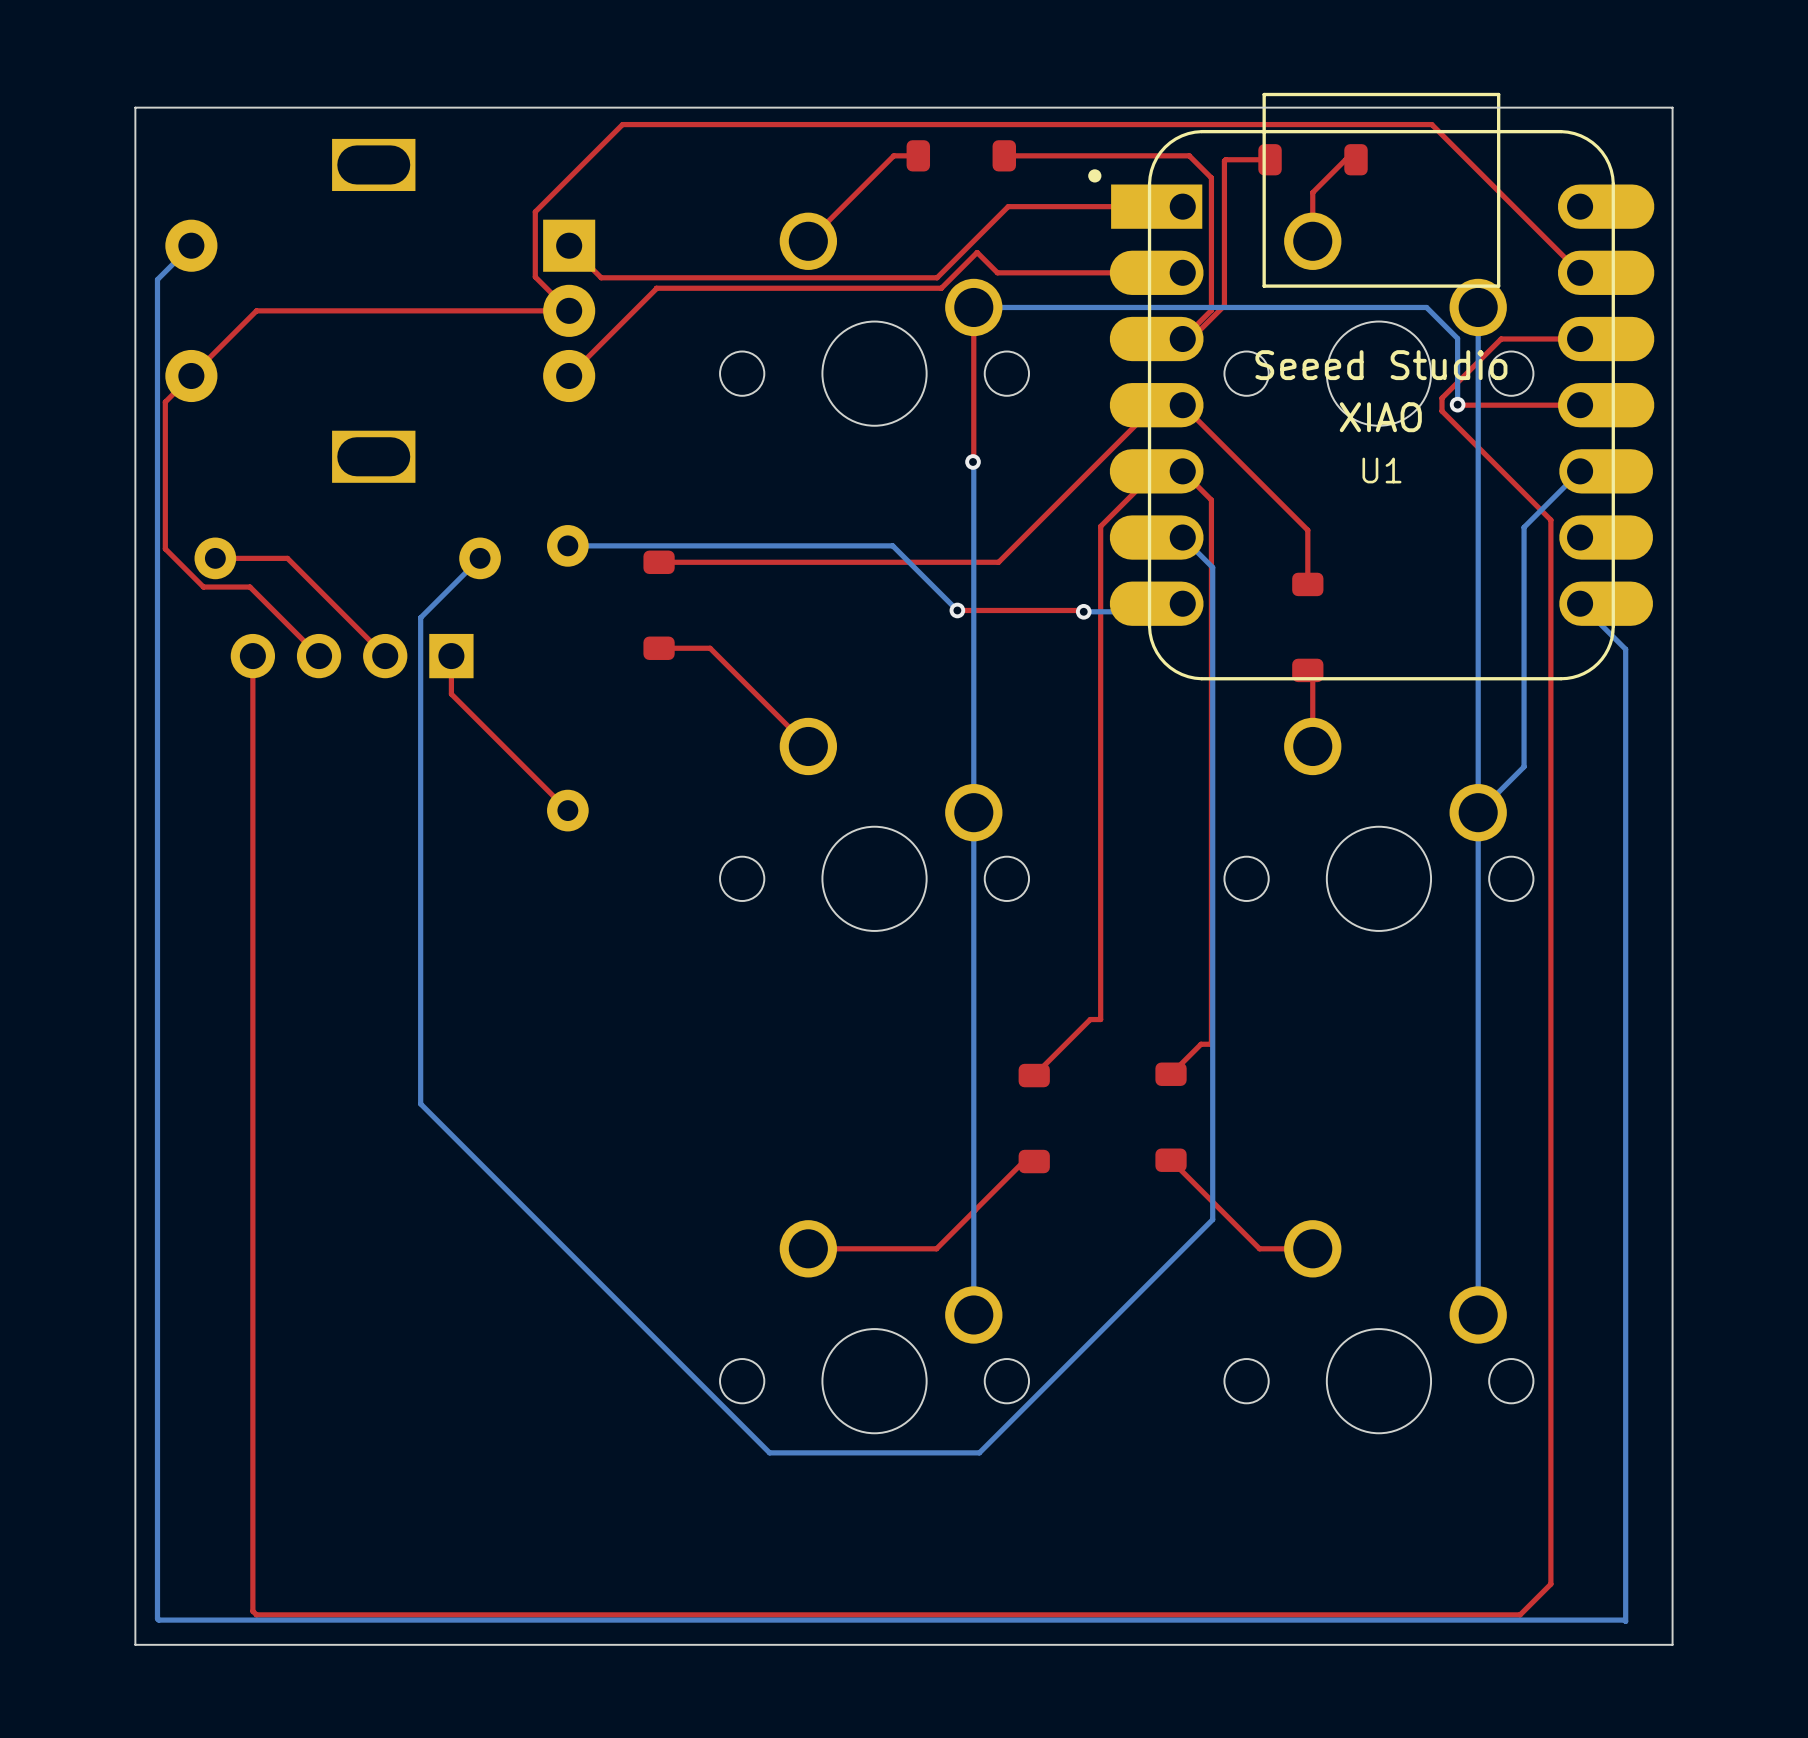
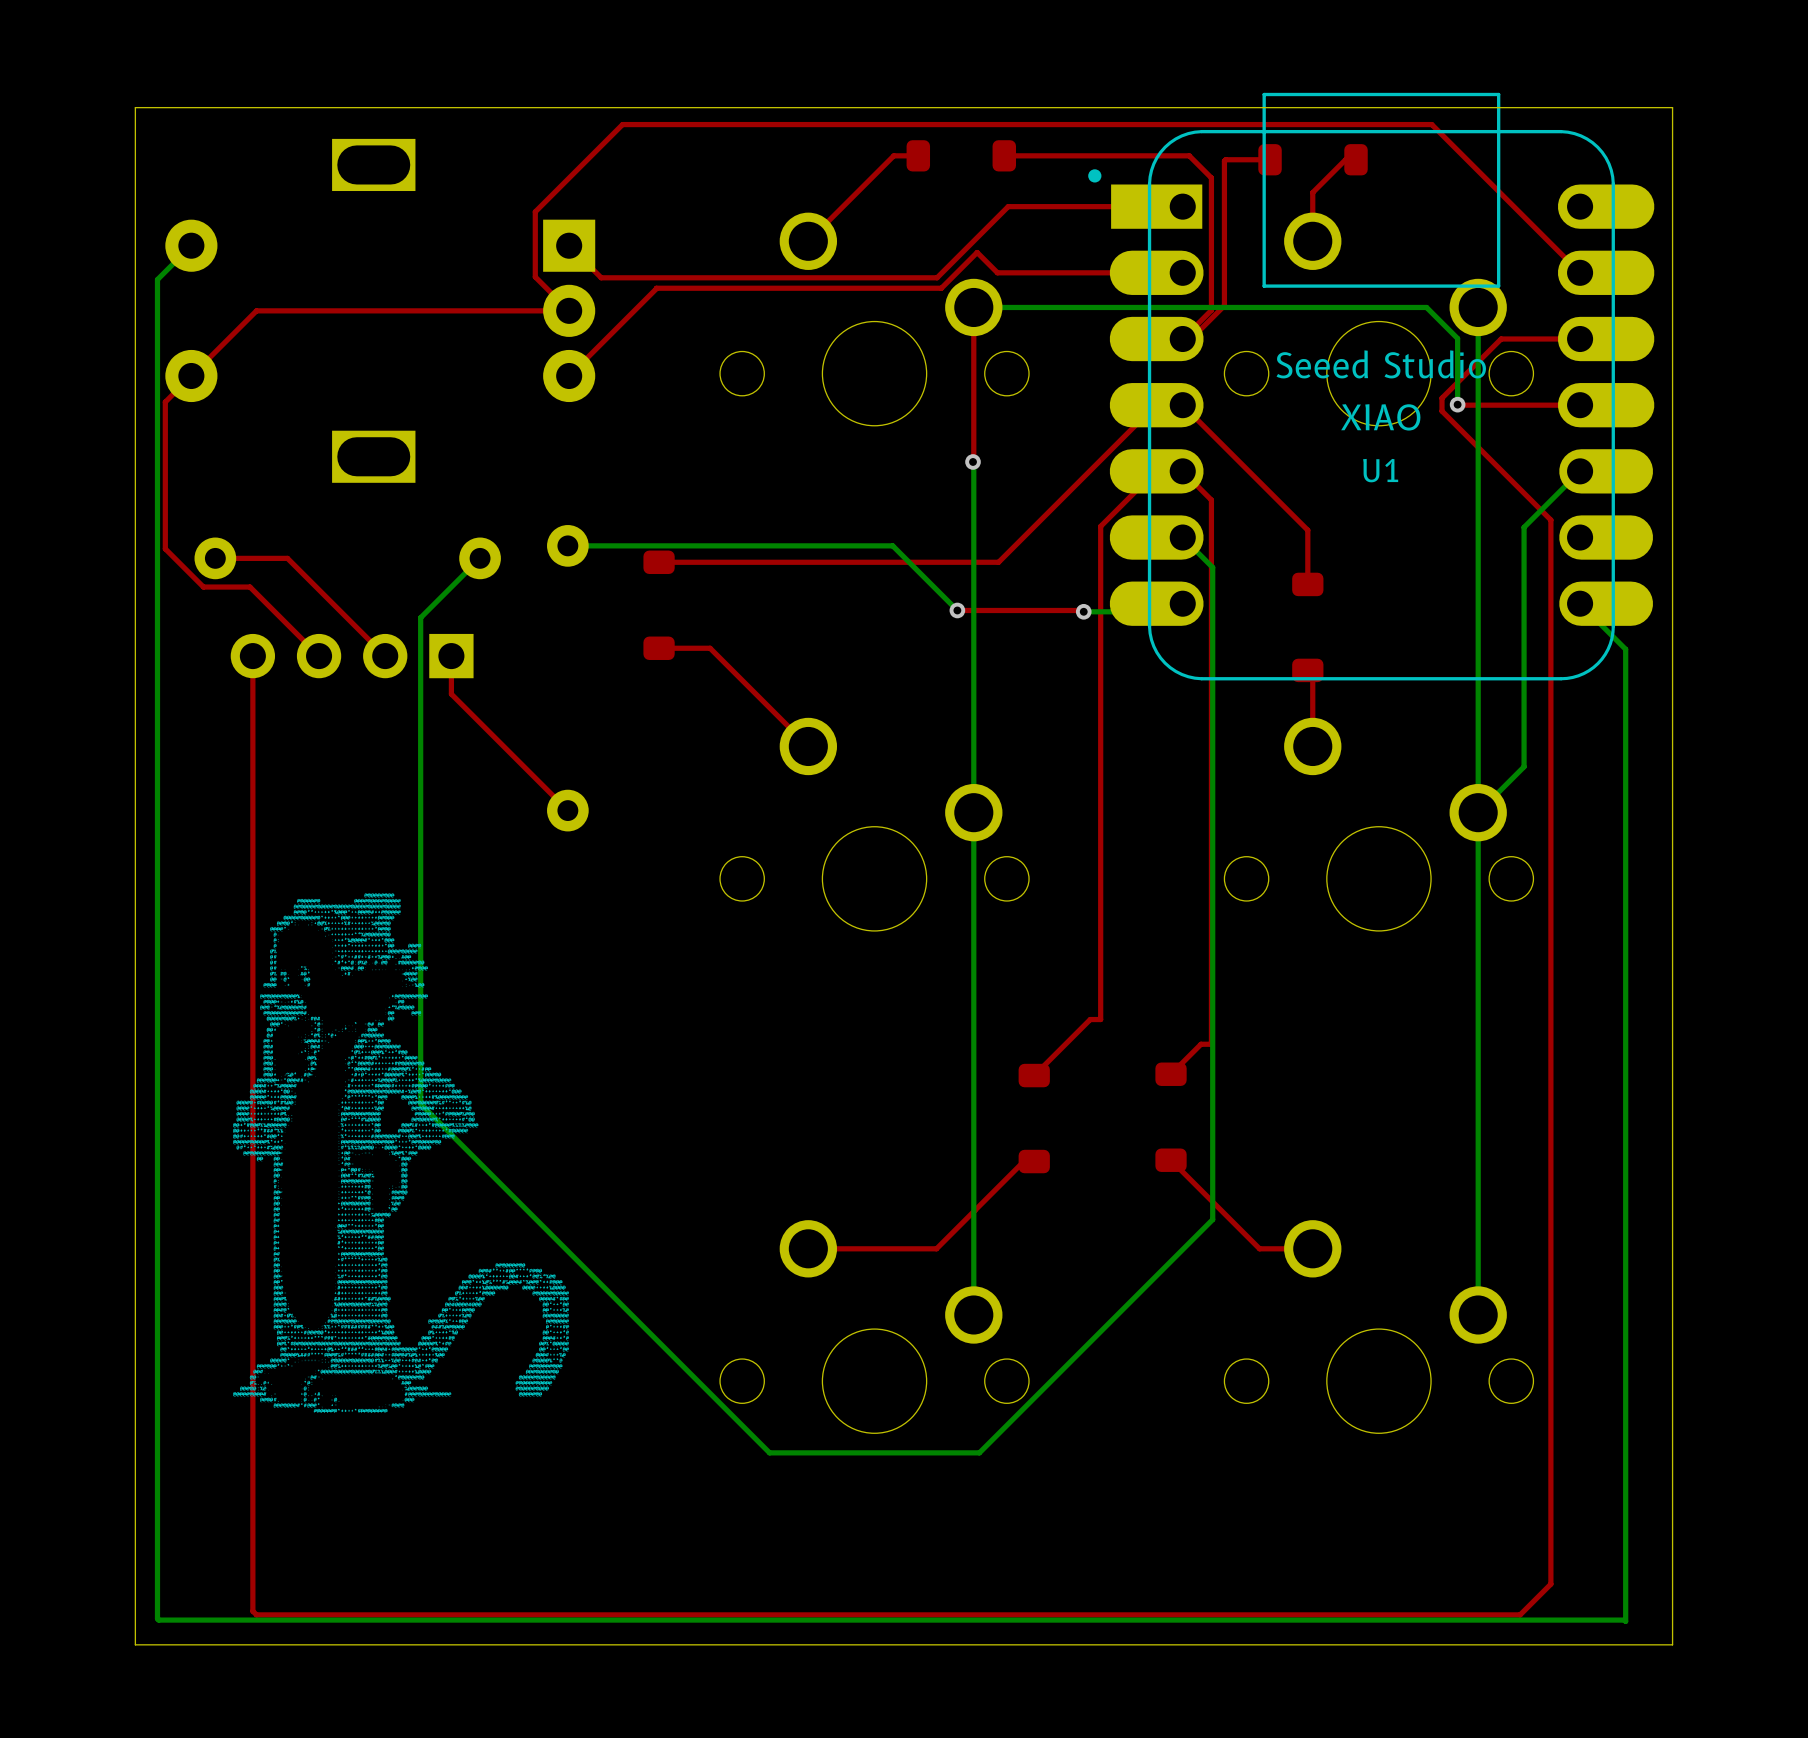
drawing: none -> [233, 893, 570, 1414]

